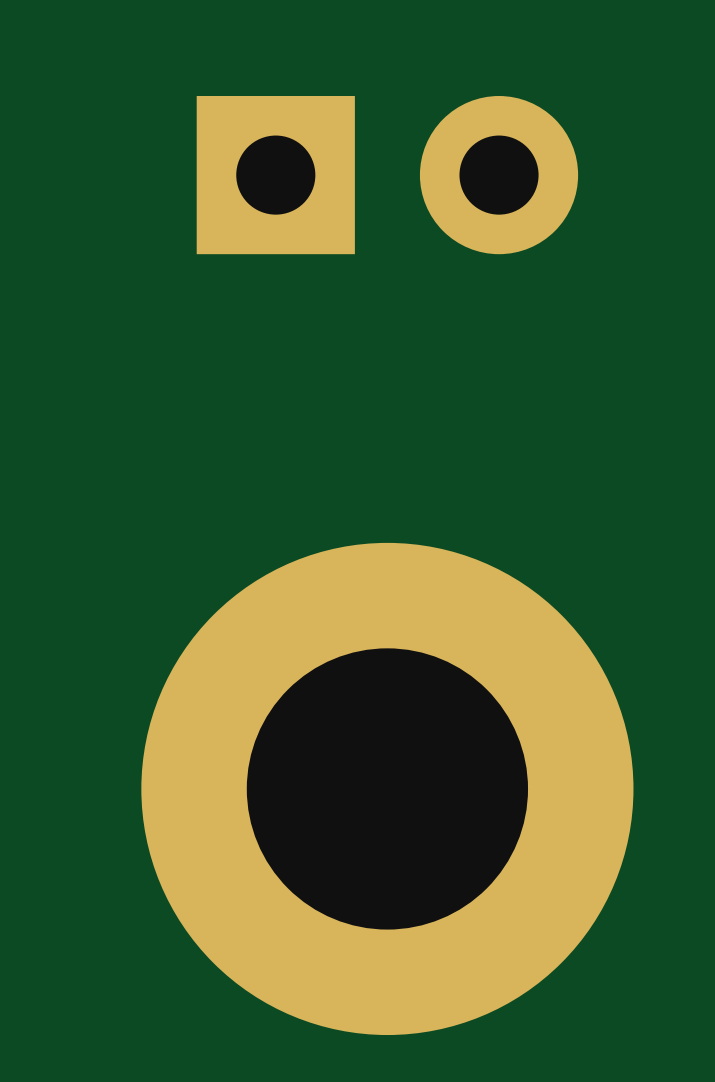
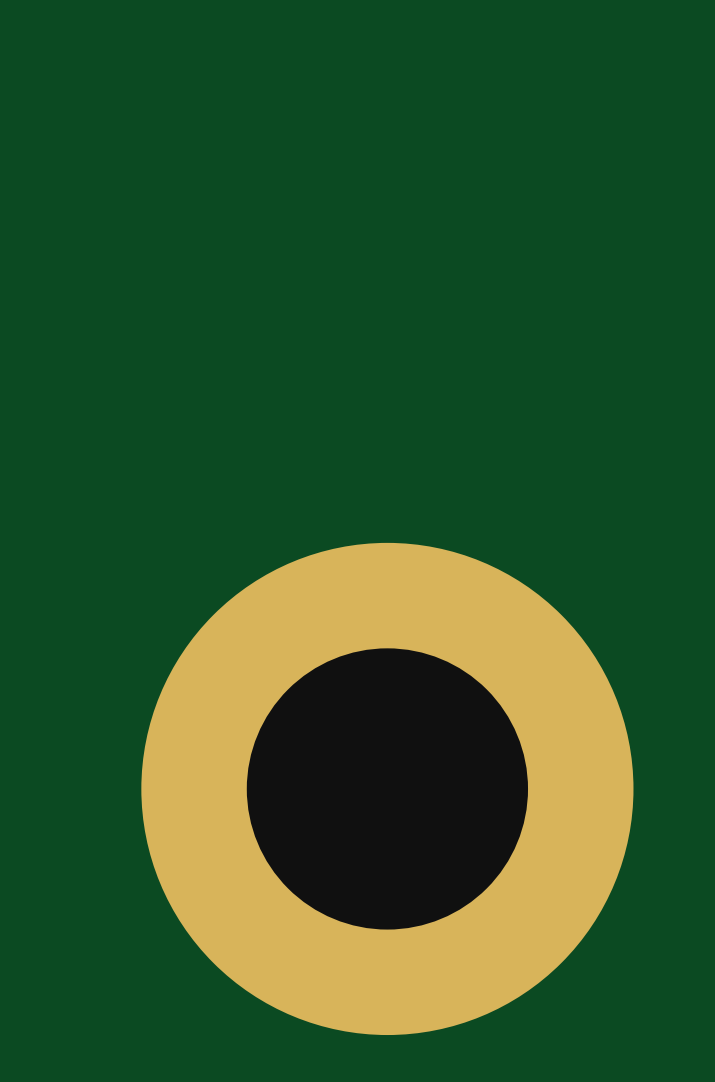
part: (387, 175) -> none

